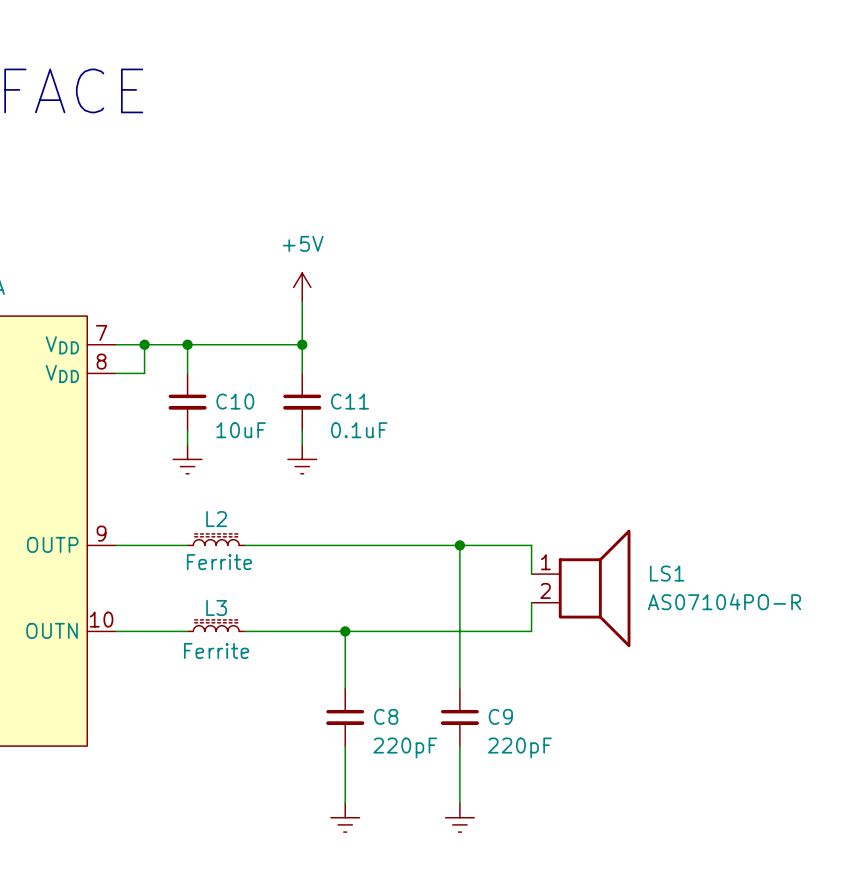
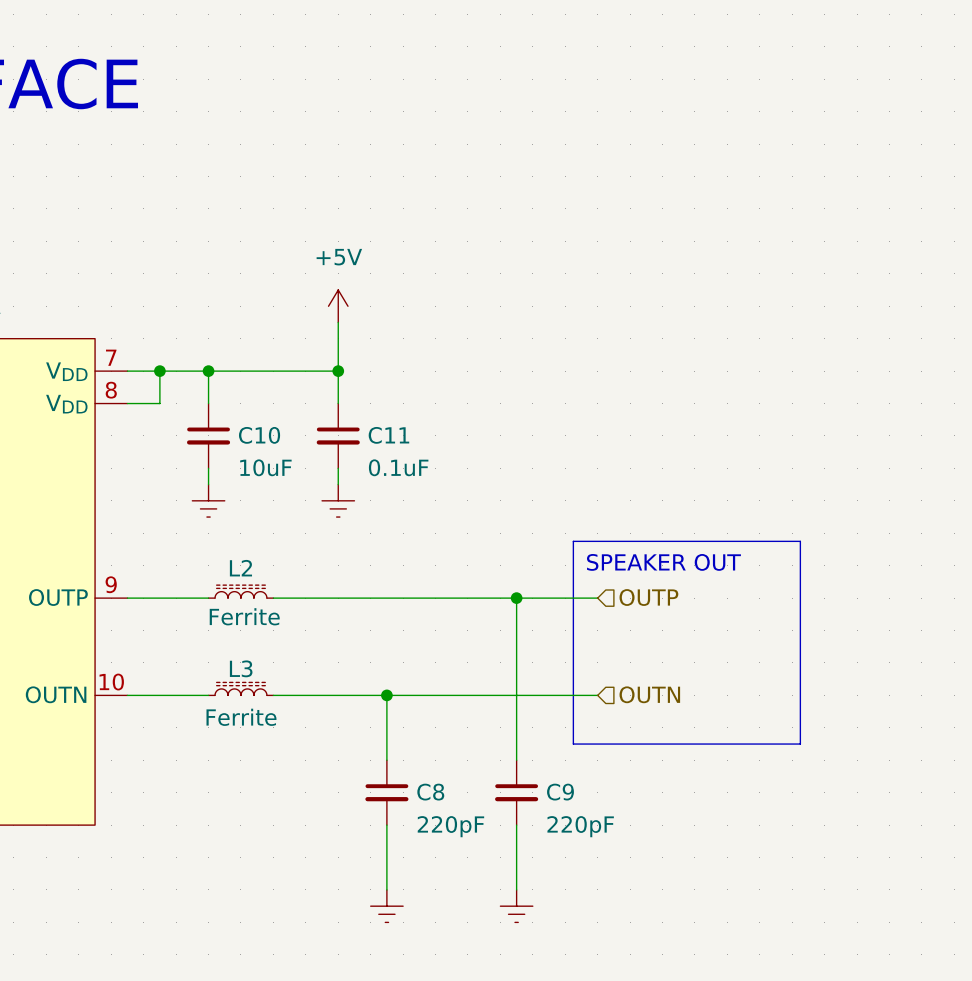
line: none -> (573, 541) (800, 541) (800, 744) (573, 744) (573, 541)
text: none -> SPEAKER OUT (663, 562)
hierarchical label: none -> OUTP (648, 597)
wire: (531, 545) (531, 574) -> none
LS1: AS07104PO-R (581, 588) -> none
wire: (531, 602) (531, 631) -> none
hierarchical label: none -> OUTN (649, 694)

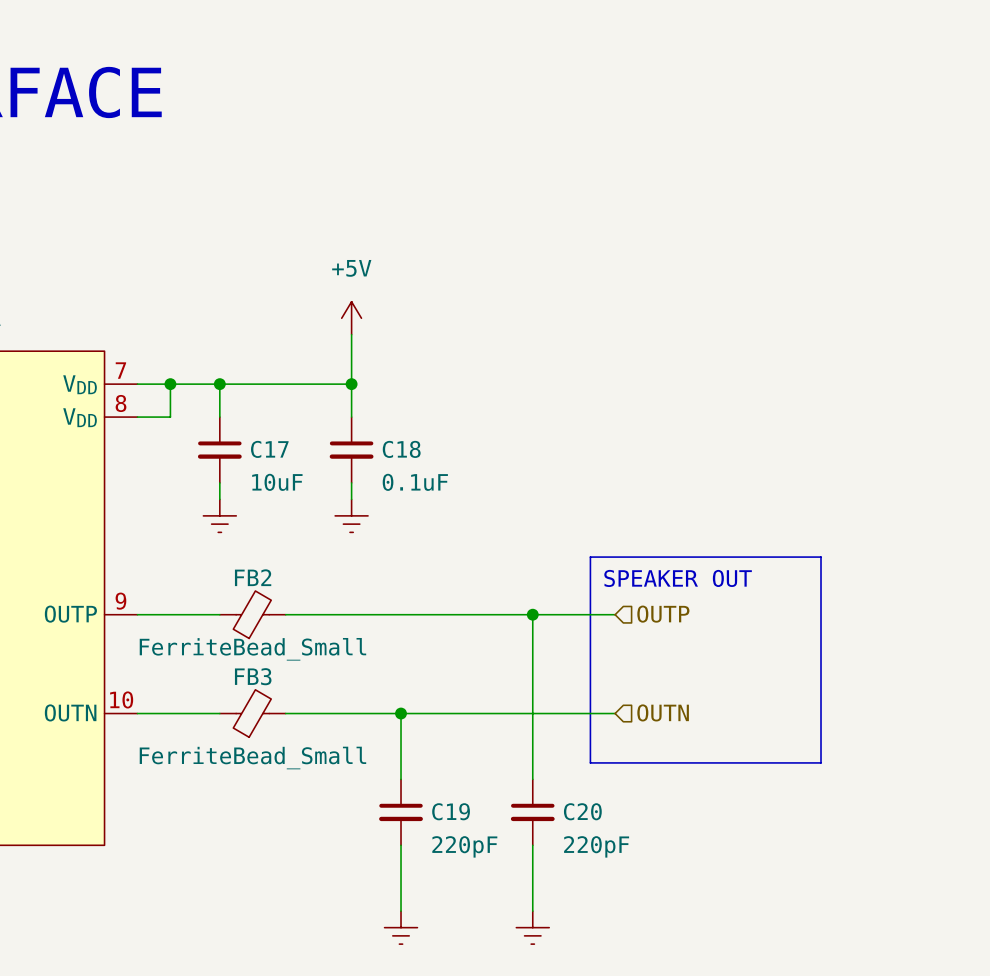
C10 name: C10 (259, 435) -> C17 (269, 449)
C11 name: C11 (388, 435) -> C18 (401, 449)
L2: Ferrite (240, 591) -> none
FB2: none -> FerriteBead_Small (252, 614)
L3: Ferrite (240, 688) -> none
FB3: none -> FerriteBead_Small (252, 713)
C8 name: C8 (430, 792) -> C19 (451, 811)
C9 name: C9 (560, 792) -> C20 (582, 811)

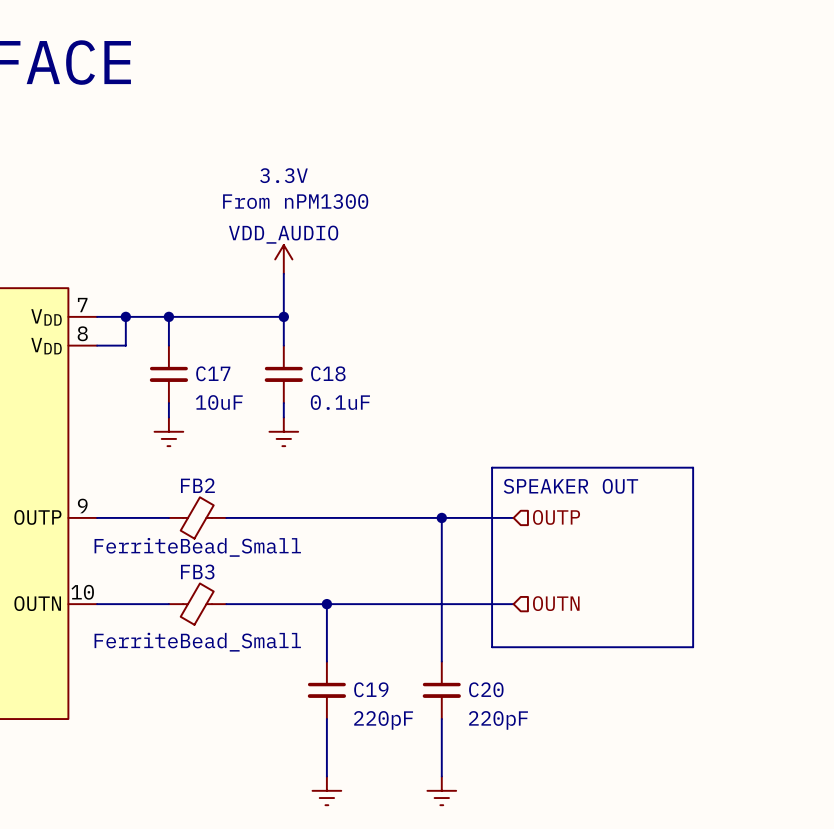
text: none -> 3.3V (283, 175)
text: none -> From nPM1300 (295, 201)
power symbol: +5V (351, 318) -> VDD_AUDIO (283, 259)

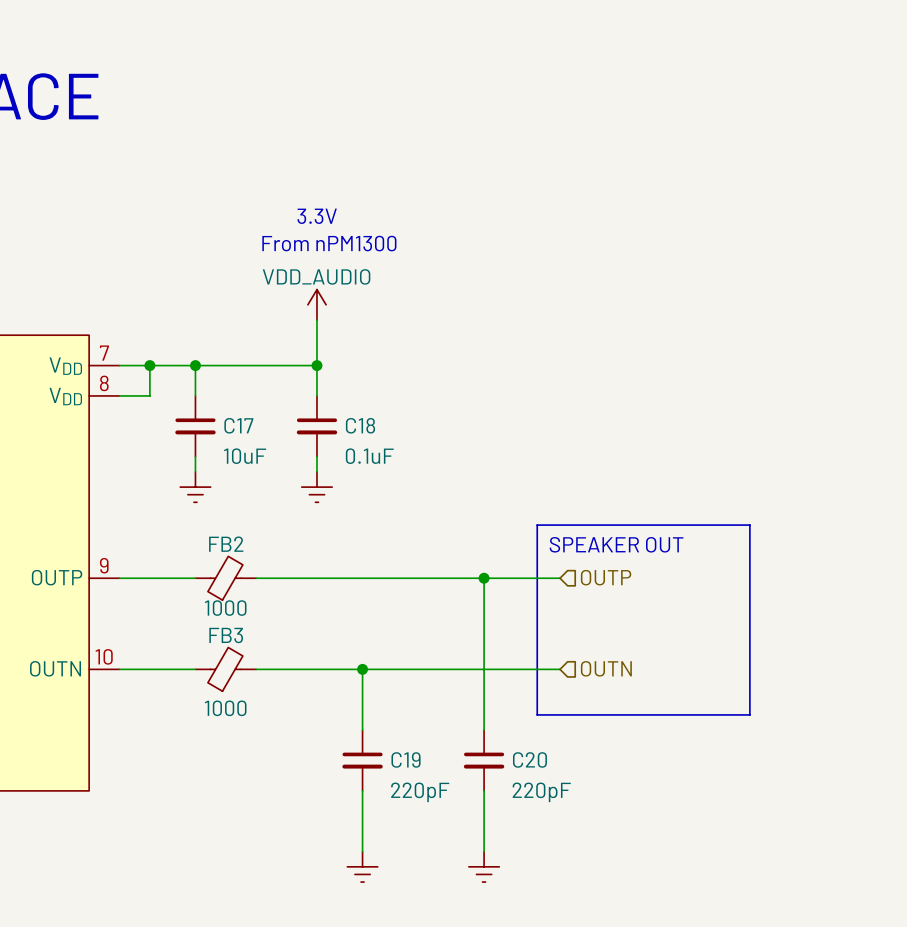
FB2 value: FerriteBead_Small (197, 547) -> 1000 (225, 608)
FB3 value: FerriteBead_Small (197, 642) -> 1000 (225, 708)

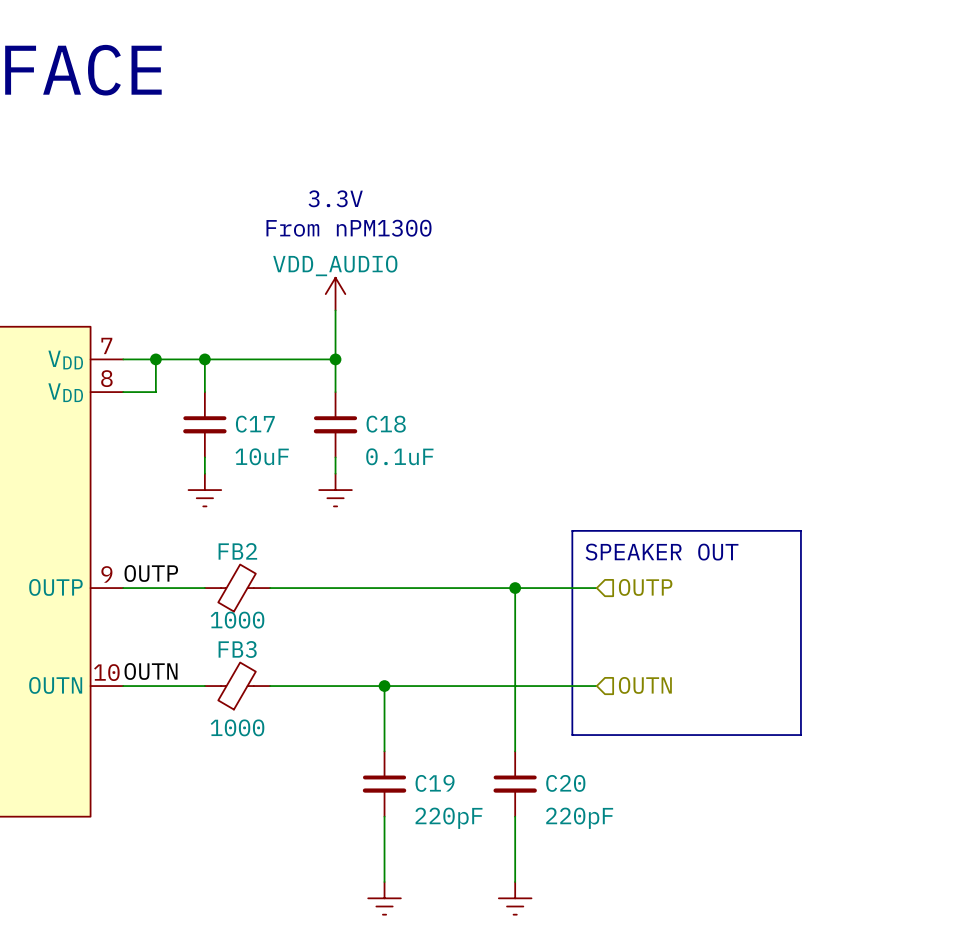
label: none -> OUTP (151, 573)
label: none -> OUTN (151, 671)

